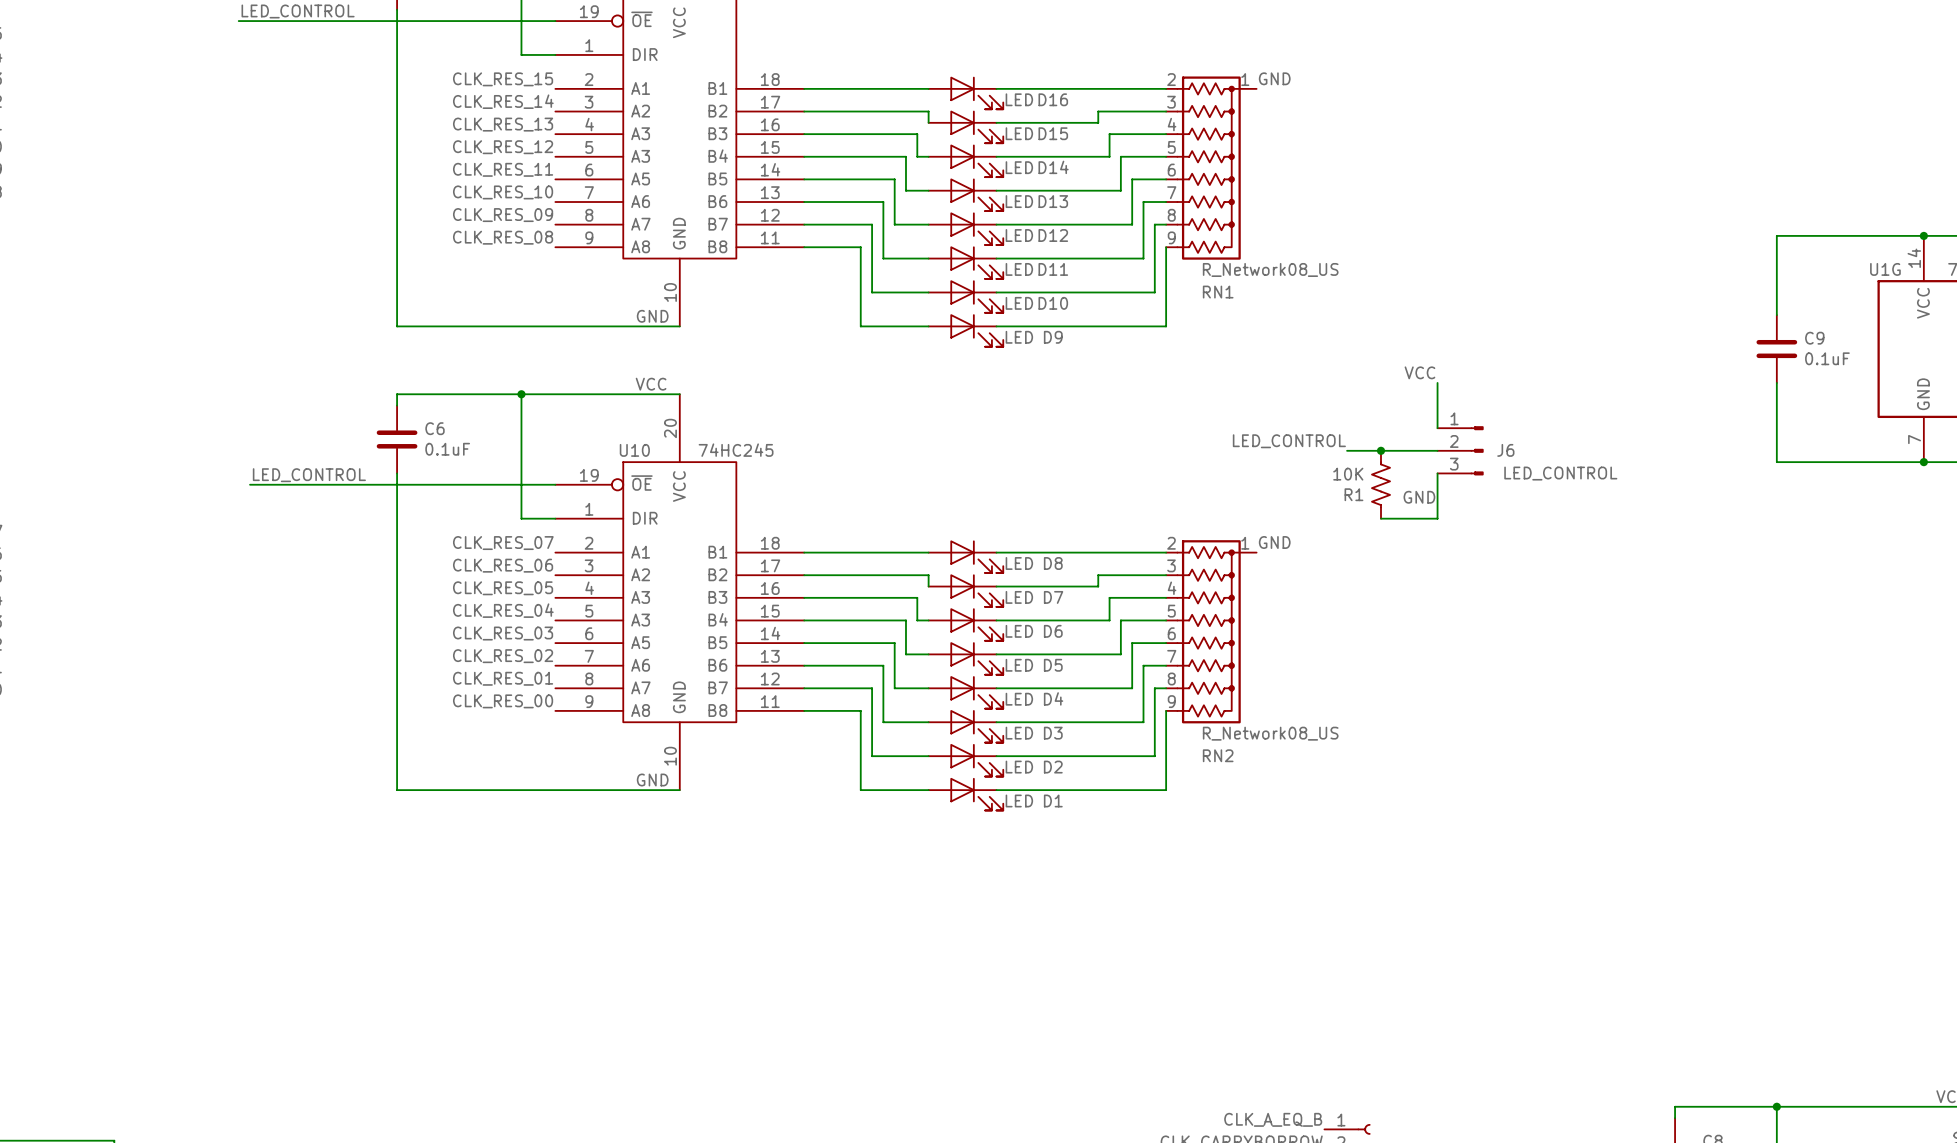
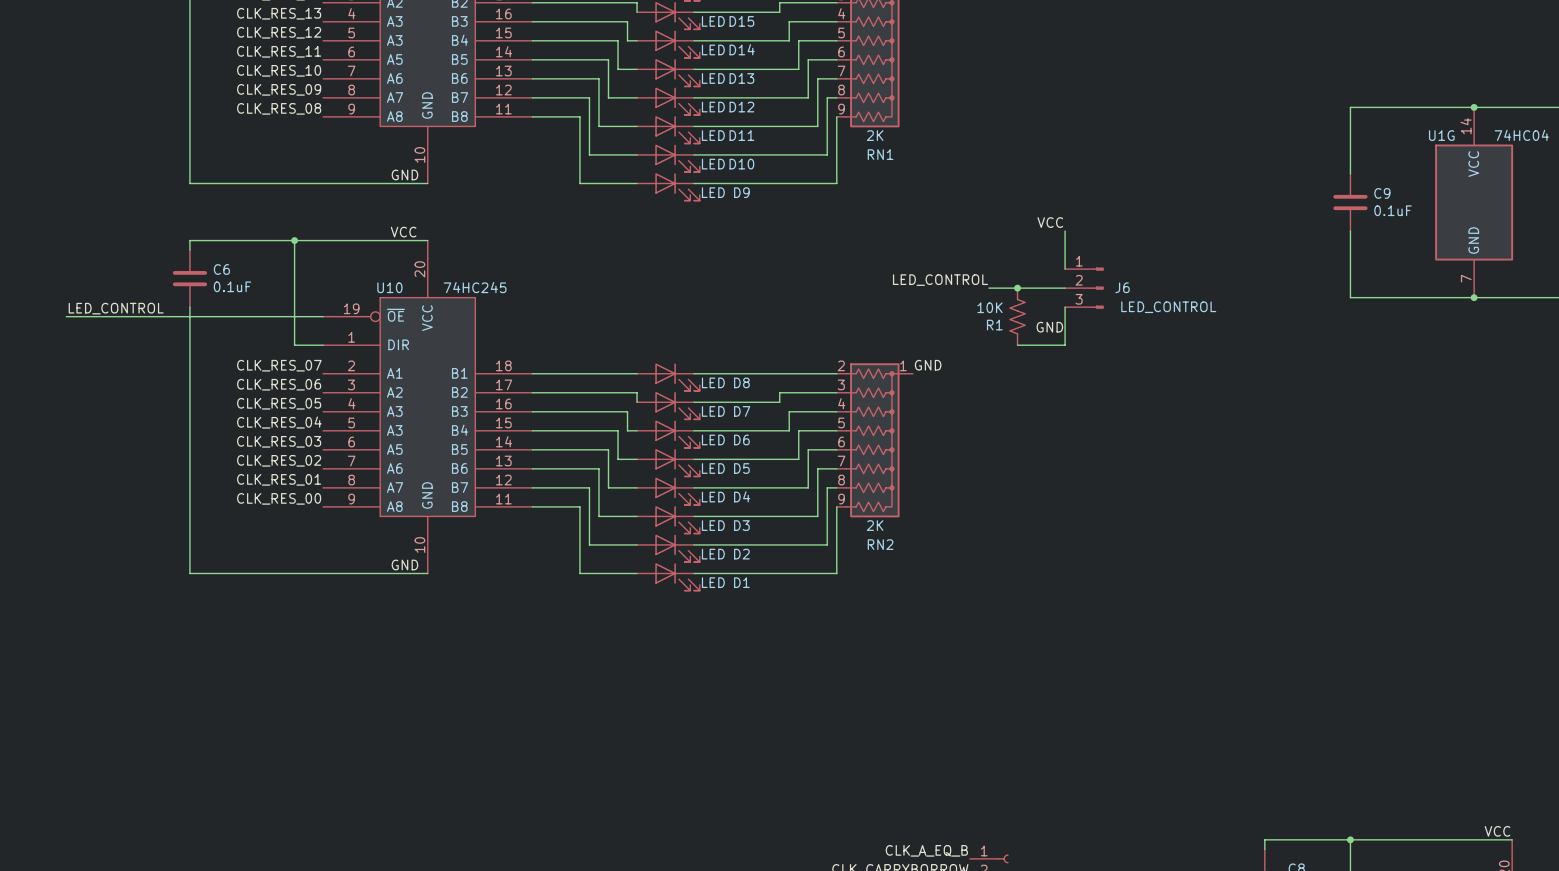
RN1 value: R_Network08_US (1270, 269) -> 2K (875, 135)
RN2 value: R_Network08_US (1270, 733) -> 2K (875, 525)

